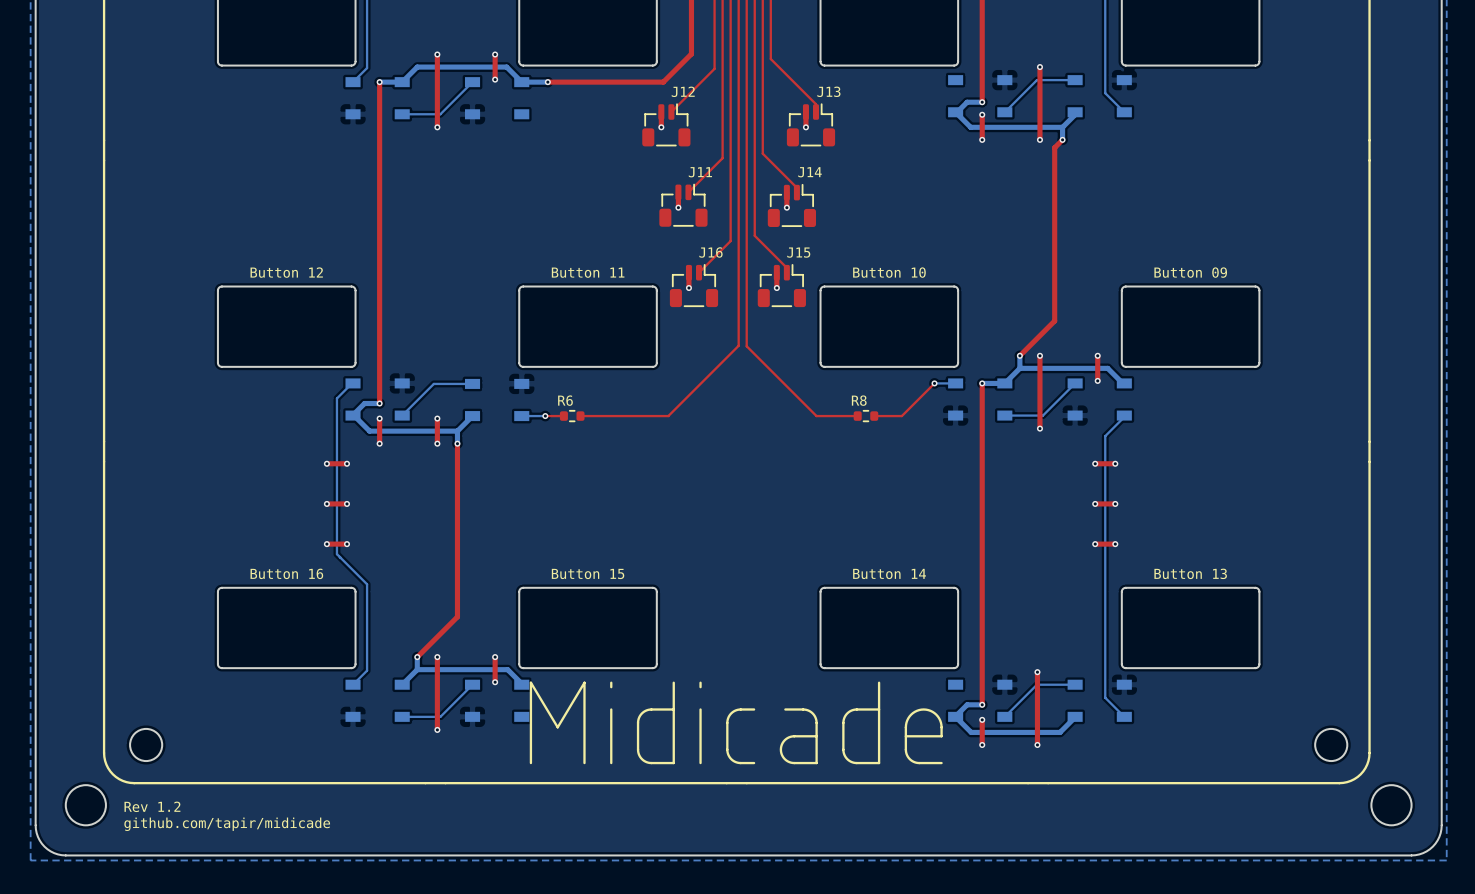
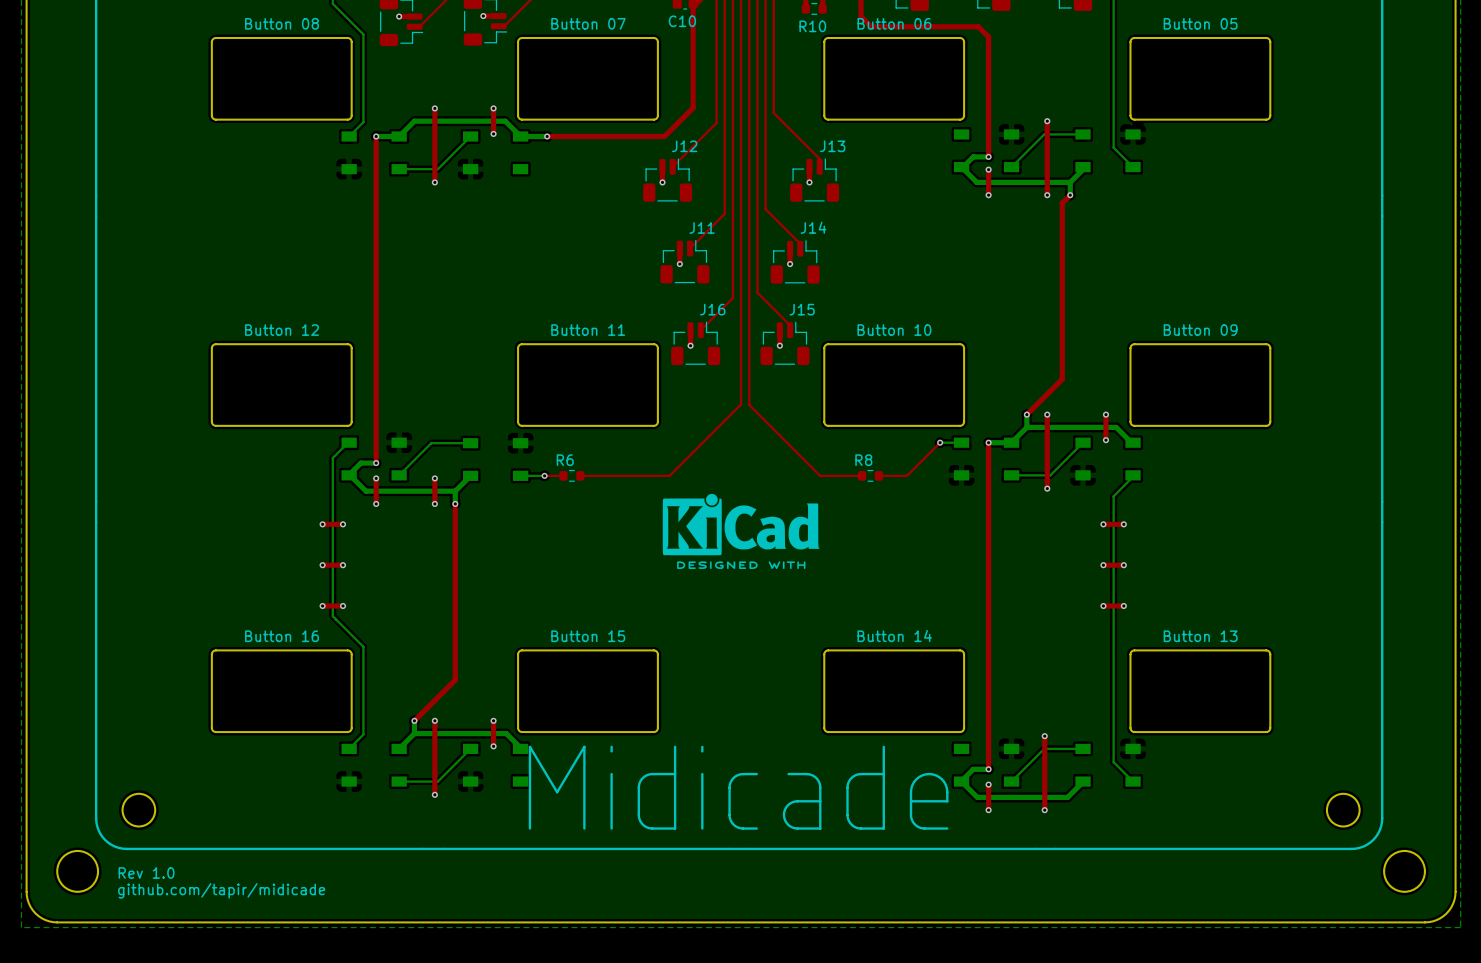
drawing: none -> [662, 493, 820, 569]
text: Rev 1.2 (152, 806) -> Rev 1.0 (146, 872)

